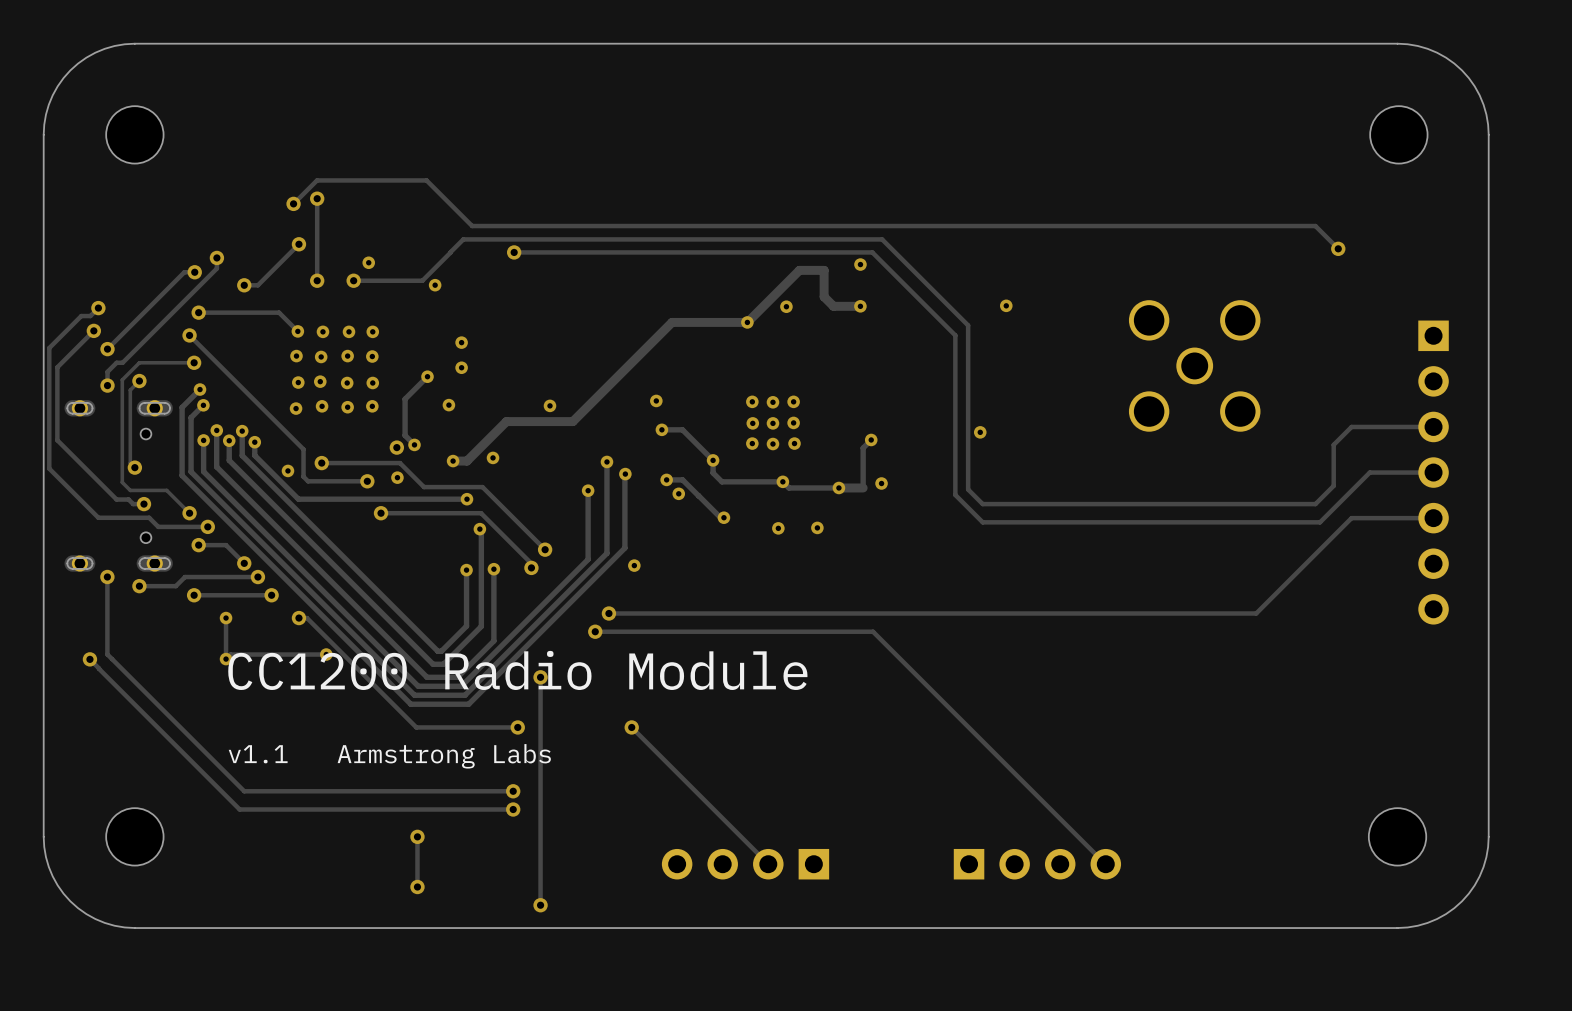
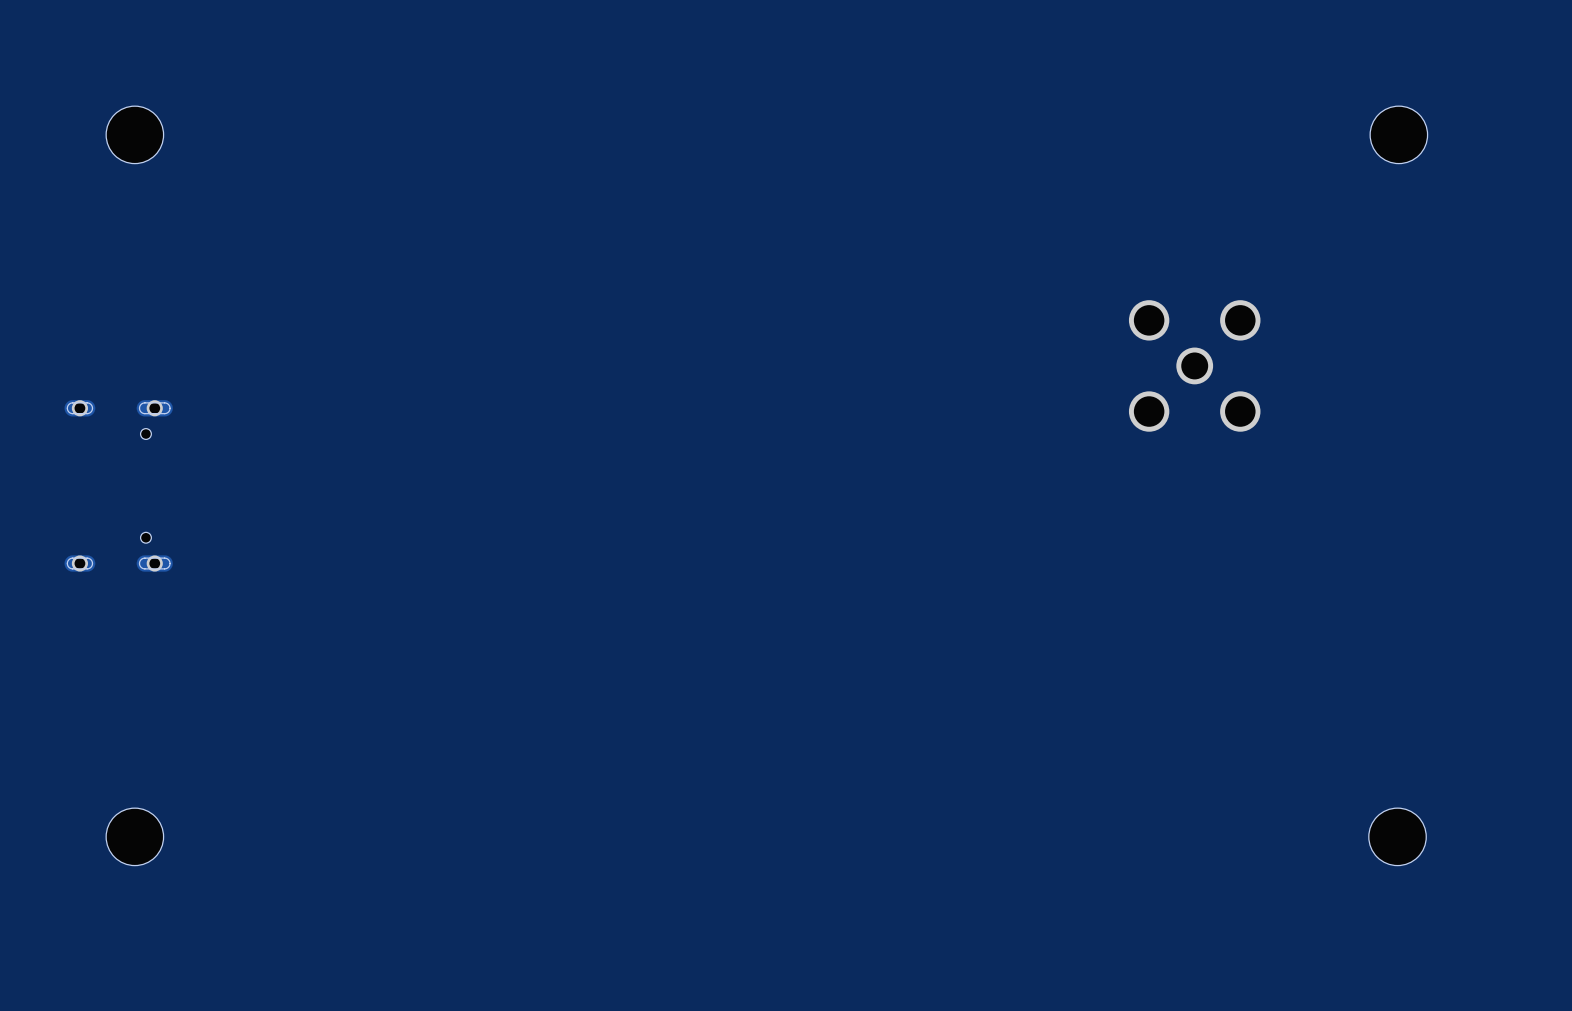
board edge: (1397, 43) (134, 43) (114, 45) (86, 57) (70, 70) (52, 95) (45, 114) (43, 134) (43, 836) (45, 857) (57, 885) (70, 901) (86, 914) (104, 922) (134, 928) (1397, 928) (1427, 922) (1446, 914) (1461, 901) (1474, 885) (1483, 866) (1488, 836) (1488, 134) (1483, 104) (1474, 86) (1462, 70) (1446, 57) (1427, 48) (1397, 43) -> none
track: (317, 198) (317, 280) -> none
via: (317, 198) -> none
via: (293, 203) -> none
track: (294, 203) (317, 180) (426, 180) (472, 226) (1315, 226) (1338, 248) -> none
track: (298, 244) (257, 285) (244, 285) -> none
via: (298, 244) -> none
via: (1338, 248) -> none
track: (514, 252) (872, 252) (955, 335) (955, 494) (982, 522) (1320, 522) (1369, 472) (1428, 472) -> none
via: (514, 252) -> none
track: (216, 257) (216, 268) (122, 362) (116, 362) (107, 371) (107, 385) -> none
via: (216, 257) -> none
via: (368, 262) -> none
via: (860, 264) -> none
track: (194, 272) (184, 272) (107, 349) -> none
via: (194, 272) -> none
via: (317, 280) -> none
track: (353, 280) (422, 280) (463, 239) (882, 239) (968, 325) (968, 489) (982, 504) (1315, 504) (1333, 485) (1333, 444) (1351, 426) (1428, 426) -> none
via: (353, 280) -> none
via: (244, 285) -> none
via: (435, 285) -> none
via: (1006, 305) -> none
via: (786, 306) -> none
track: (860, 306) (833, 306) (824, 296) (824, 270) (799, 270) (747, 322) (672, 322) (572, 421) (506, 421) (466, 461) (453, 461) -> none
via: (860, 306) -> none
track: (98, 308) (90, 316) (81, 316) (49, 348) (49, 468) (98, 517) (149, 517) (158, 526) (207, 526) -> none
via: (98, 308) -> none
track: (198, 312) (279, 312) (297, 331) -> none
via: (198, 312) -> none
via: (747, 322) -> none
track: (93, 330) (57, 367) (57, 440) (116, 499) (128, 499) (133, 504) (143, 504) -> none
via: (93, 330) -> none
via: (297, 331) -> none
via: (322, 331) -> none
via: (348, 331) -> none
via: (372, 331) -> none
track: (189, 335) (303, 449) (303, 476) (308, 481) (367, 481) -> none
via: (189, 335) -> none
via: (461, 342) -> none
via: (107, 349) -> none
via: (296, 356) -> none
via: (321, 356) -> none
via: (347, 356) -> none
via: (372, 356) -> none
track: (194, 362) (139, 362) (122, 379) (122, 482) (130, 490) (166, 490) (189, 513) -> none
via: (194, 362) -> none
via: (461, 367) -> none
track: (427, 376) (405, 399) (405, 435) (414, 444) -> none
via: (427, 376) -> none
track: (139, 381) (130, 390) (130, 463) (134, 467) -> none
via: (139, 381) -> none
via: (320, 381) -> none
via: (298, 382) -> none
via: (347, 383) -> none
via: (372, 383) -> none
via: (107, 385) -> none
track: (200, 389) (182, 407) (182, 475) (410, 704) (468, 704) (624, 548) (625, 474) -> none
via: (200, 389) -> none
via: (656, 400) -> none
via: (752, 401) -> none
via: (793, 401) -> none
via: (772, 402) -> none
track: (203, 405) (191, 417) (191, 471) (414, 695) (465, 695) (606, 553) (606, 461) -> none
via: (203, 405) -> none
via: (448, 405) -> none
via: (549, 405) -> none
via: (322, 406) -> none
via: (372, 406) -> none
via: (347, 407) -> none
via: (296, 408) -> none
via: (793, 422) -> none
via: (752, 423) -> none
via: (772, 423) -> none
track: (661, 429) (682, 429) (713, 460) (713, 472) (721, 481) (782, 481) (789, 487) (863, 487) (863, 448) (871, 439) -> none
via: (661, 429) -> none
track: (216, 430) (216, 466) (427, 677) (457, 677) (493, 640) (493, 569) -> none
via: (216, 430) -> none
track: (242, 431) (242, 455) (437, 651) (441, 651) (466, 626) (466, 570) -> none
via: (242, 431) -> none
via: (980, 432) -> none
via: (871, 439) -> none
track: (203, 440) (203, 471) (418, 686) (461, 686) (588, 559) (588, 490) -> none
via: (203, 440) -> none
track: (229, 440) (229, 460) (433, 664) (443, 664) (481, 626) (481, 531) -> none
via: (229, 440) -> none
track: (254, 442) (254, 455) (298, 499) (466, 499) -> none
via: (254, 442) -> none
via: (752, 443) -> none
via: (794, 443) -> none
via: (414, 444) -> none
via: (772, 444) -> none
via: (396, 447) -> none
via: (493, 457) -> none
via: (713, 460) -> none
via: (453, 461) -> none
via: (606, 461) -> none
track: (321, 463) (399, 463) (424, 487) (482, 487) (545, 549) -> none
via: (321, 463) -> none
via: (134, 467) -> none
via: (287, 470) -> none
part: (1433, 472) -> none
via: (625, 474) -> none
via: (397, 477) -> none
track: (666, 479) (682, 479) (698, 495) -> none
via: (666, 479) -> none
via: (367, 481) -> none
via: (782, 481) -> none
via: (881, 483) -> none
via: (838, 487) -> none
via: (588, 490) -> none
via: (678, 493) -> none
track: (698, 495) (720, 517) (723, 517) -> none
via: (466, 499) -> none
via: (143, 504) -> none
via: (189, 513) -> none
track: (381, 513) (481, 513) (531, 563) (531, 567) -> none
via: (381, 513) -> none
via: (723, 517) -> none
track: (1428, 518) (1351, 518) (1256, 613) (608, 613) -> none
via: (207, 526) -> none
via: (817, 527) -> none
via: (778, 528) -> none
via: (479, 529) -> none
track: (198, 545) (226, 545) (244, 563) -> none
via: (198, 545) -> none
via: (545, 549) -> none
via: (244, 563) -> none
via: (634, 565) -> none
via: (531, 567) -> none
via: (493, 569) -> none
via: (466, 570) -> none
track: (107, 576) (107, 654) (244, 791) (513, 791) -> none
via: (107, 576) -> none
track: (257, 577) (185, 577) (175, 586) (139, 586) -> none
via: (257, 577) -> none
via: (139, 586) -> none
via: (194, 595) -> none
track: (271, 595) (194, 595) -> none
via: (271, 595) -> none
via: (608, 613) -> none
track: (226, 618) (226, 659) (230, 654) (326, 654) -> none
via: (226, 618) -> none
track: (298, 618) (306, 618) (416, 727) (517, 727) -> none
via: (298, 618) -> none
track: (595, 631) (873, 631) (1105, 864) -> none
via: (595, 631) -> none
via: (326, 654) -> none
track: (89, 659) (239, 809) (513, 809) -> none
via: (89, 659) -> none
via: (226, 659) -> none
text: CC1200 Radio Module (517, 670) -> none
track: (540, 677) (540, 905) -> none
via: (540, 677) -> none
via: (517, 727) -> none
track: (631, 727) (768, 864) -> none
via: (631, 727) -> none
text: v1.1 (258, 754) -> none
text: Armstrong Labs (444, 756) -> none
via: (513, 791) -> none
via: (513, 809) -> none
track: (417, 836) (417, 887) -> none
via: (417, 836) -> none
part: (745, 864) -> none
part: (1037, 864) -> none
via: (417, 887) -> none
via: (540, 905) -> none

